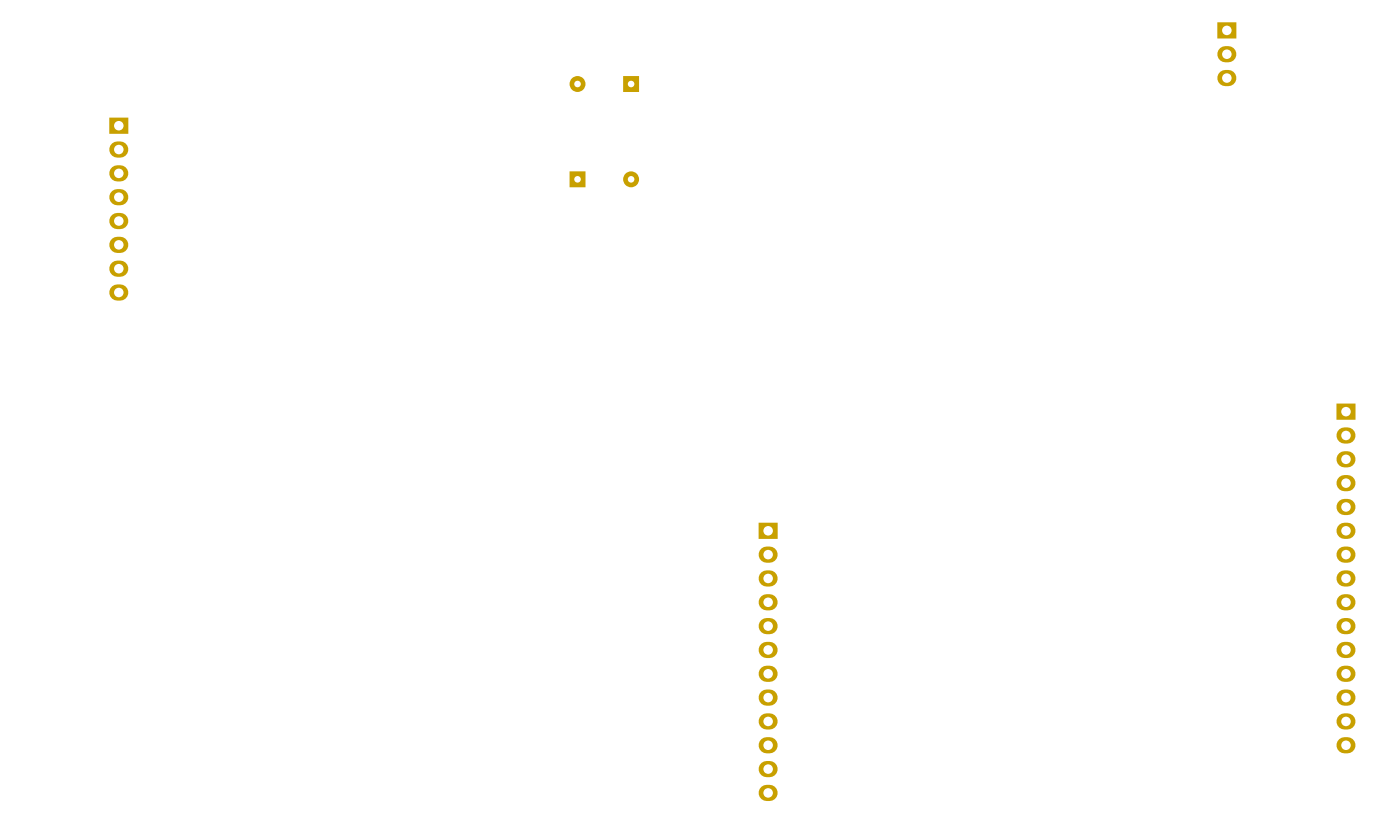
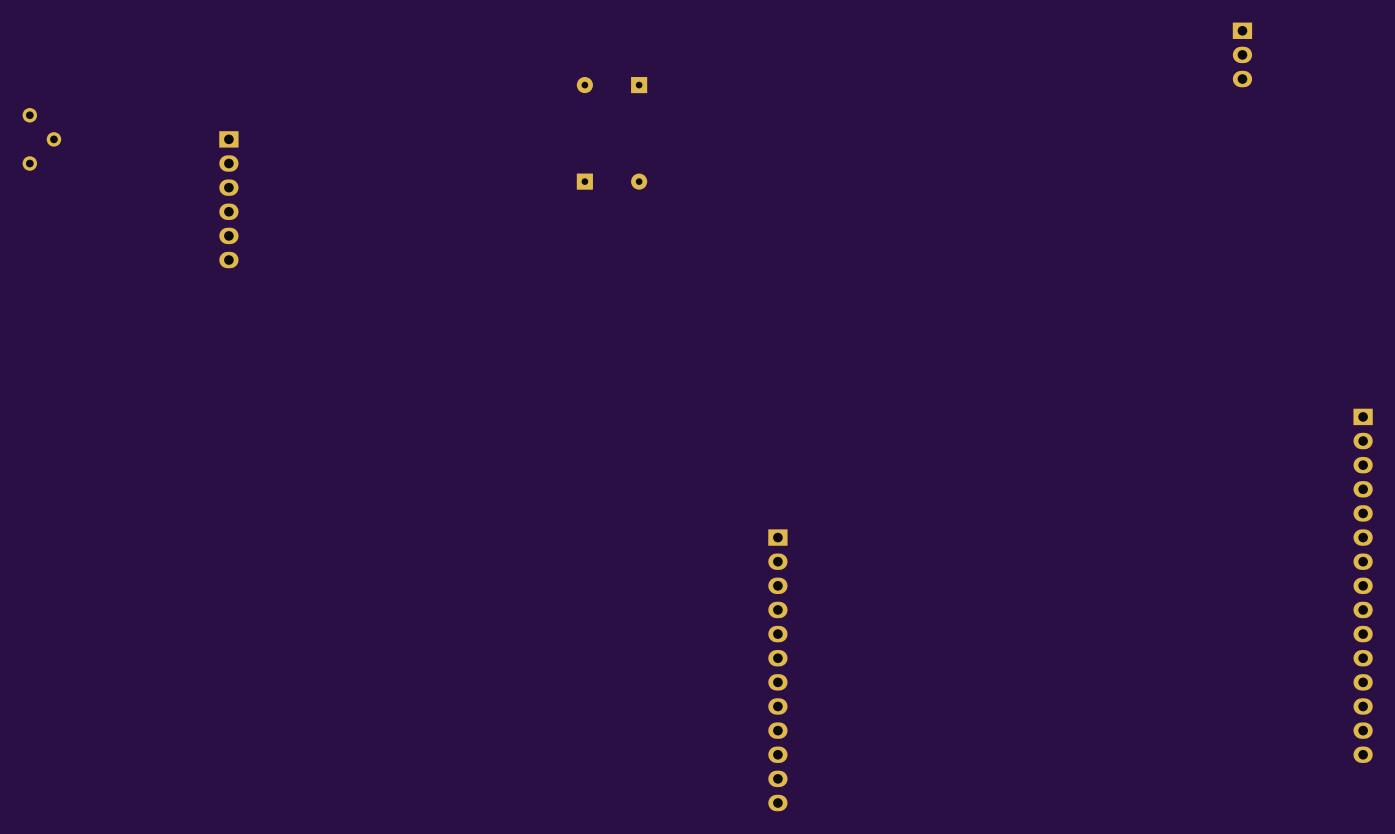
part: none -> (41, 139)
part: none -> (228, 199)
part: (118, 209) -> none

